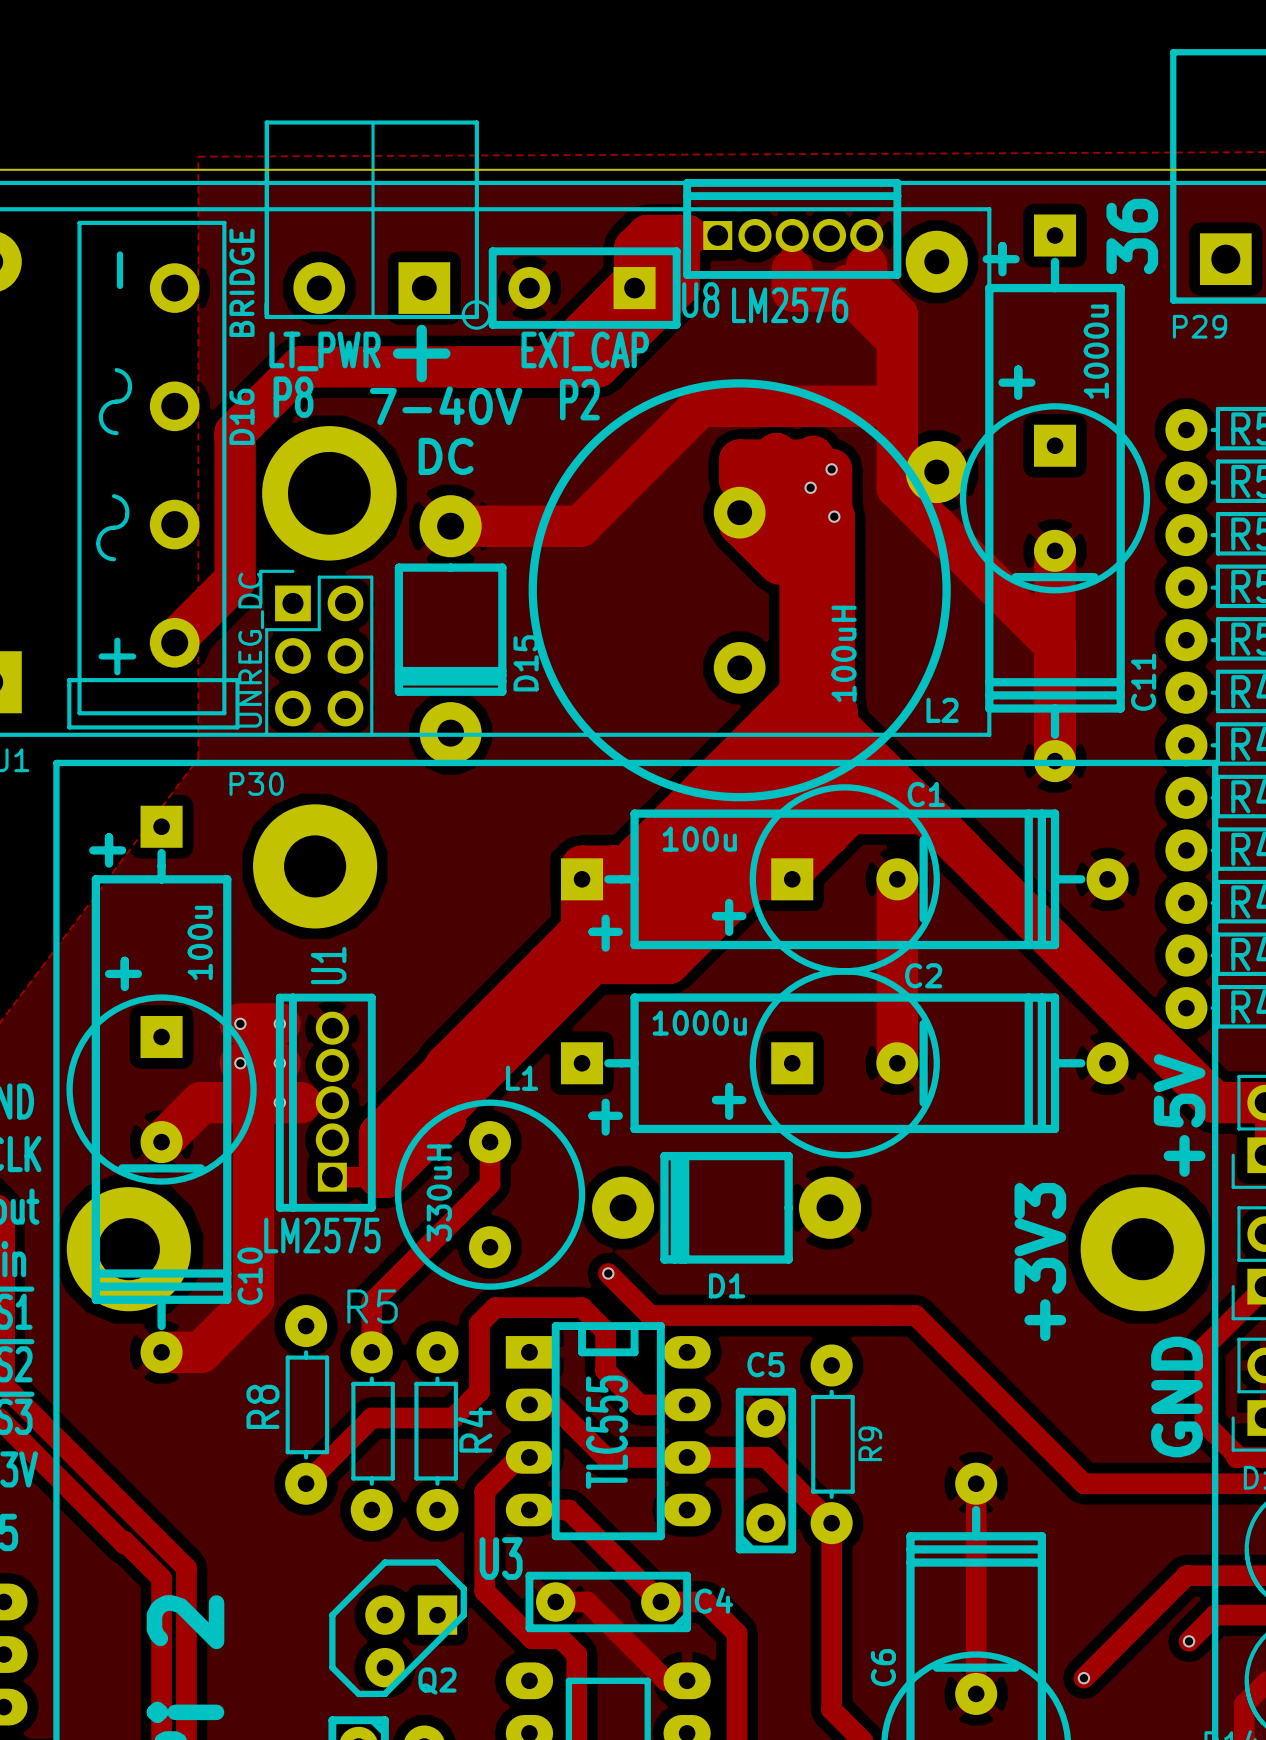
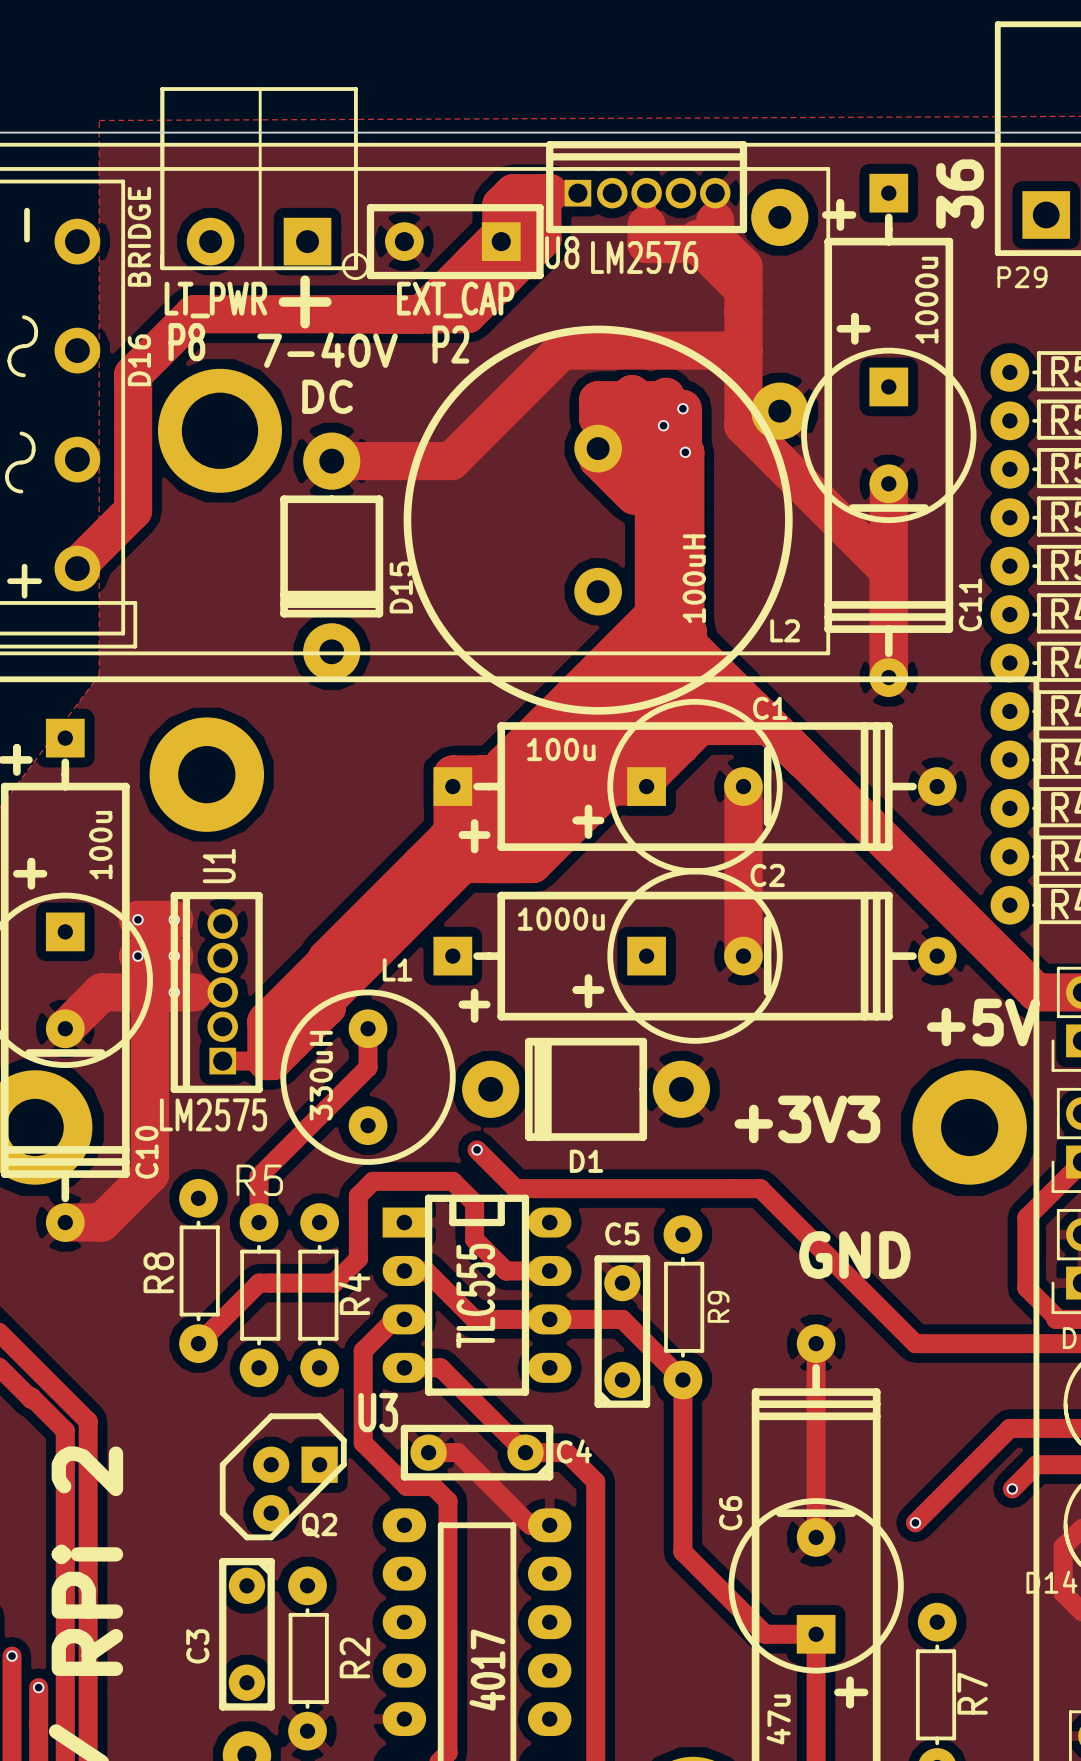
P30: UNREG_DC (316, 653) -> none
text rotation: 0° (1179, 1115) -> 90° clockwise (983, 1022)
text rotation: 0° (1040, 1262) -> 90° clockwise (807, 1119)
text rotation: 0° (1176, 1397) -> 90° clockwise (854, 1255)
text position: GND (1176, 1397) -> GND (854, 1255)

